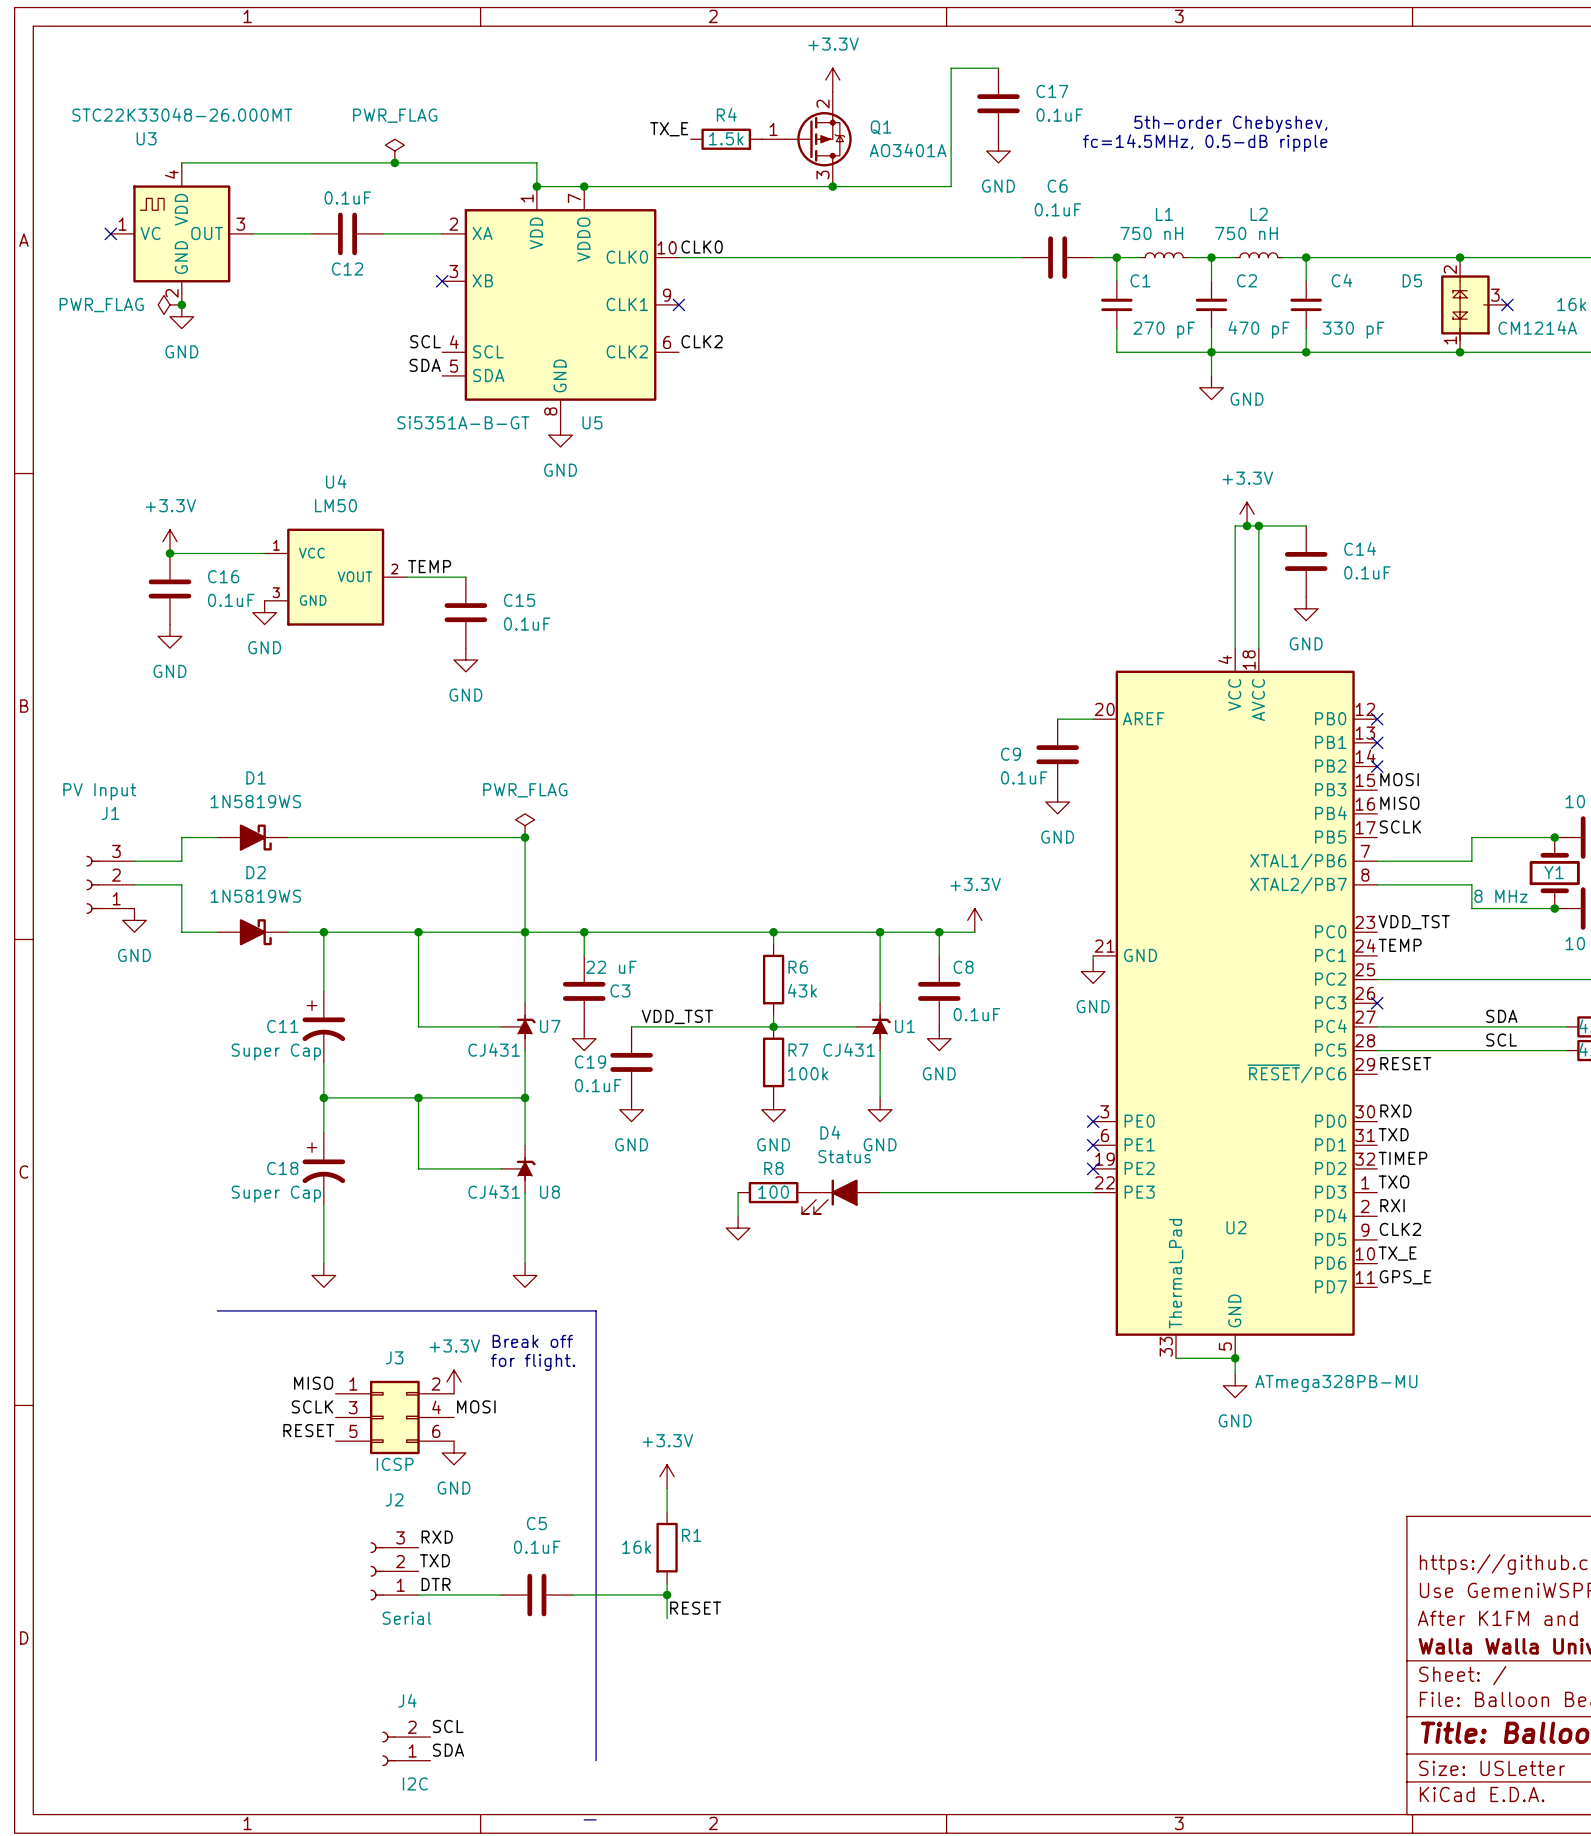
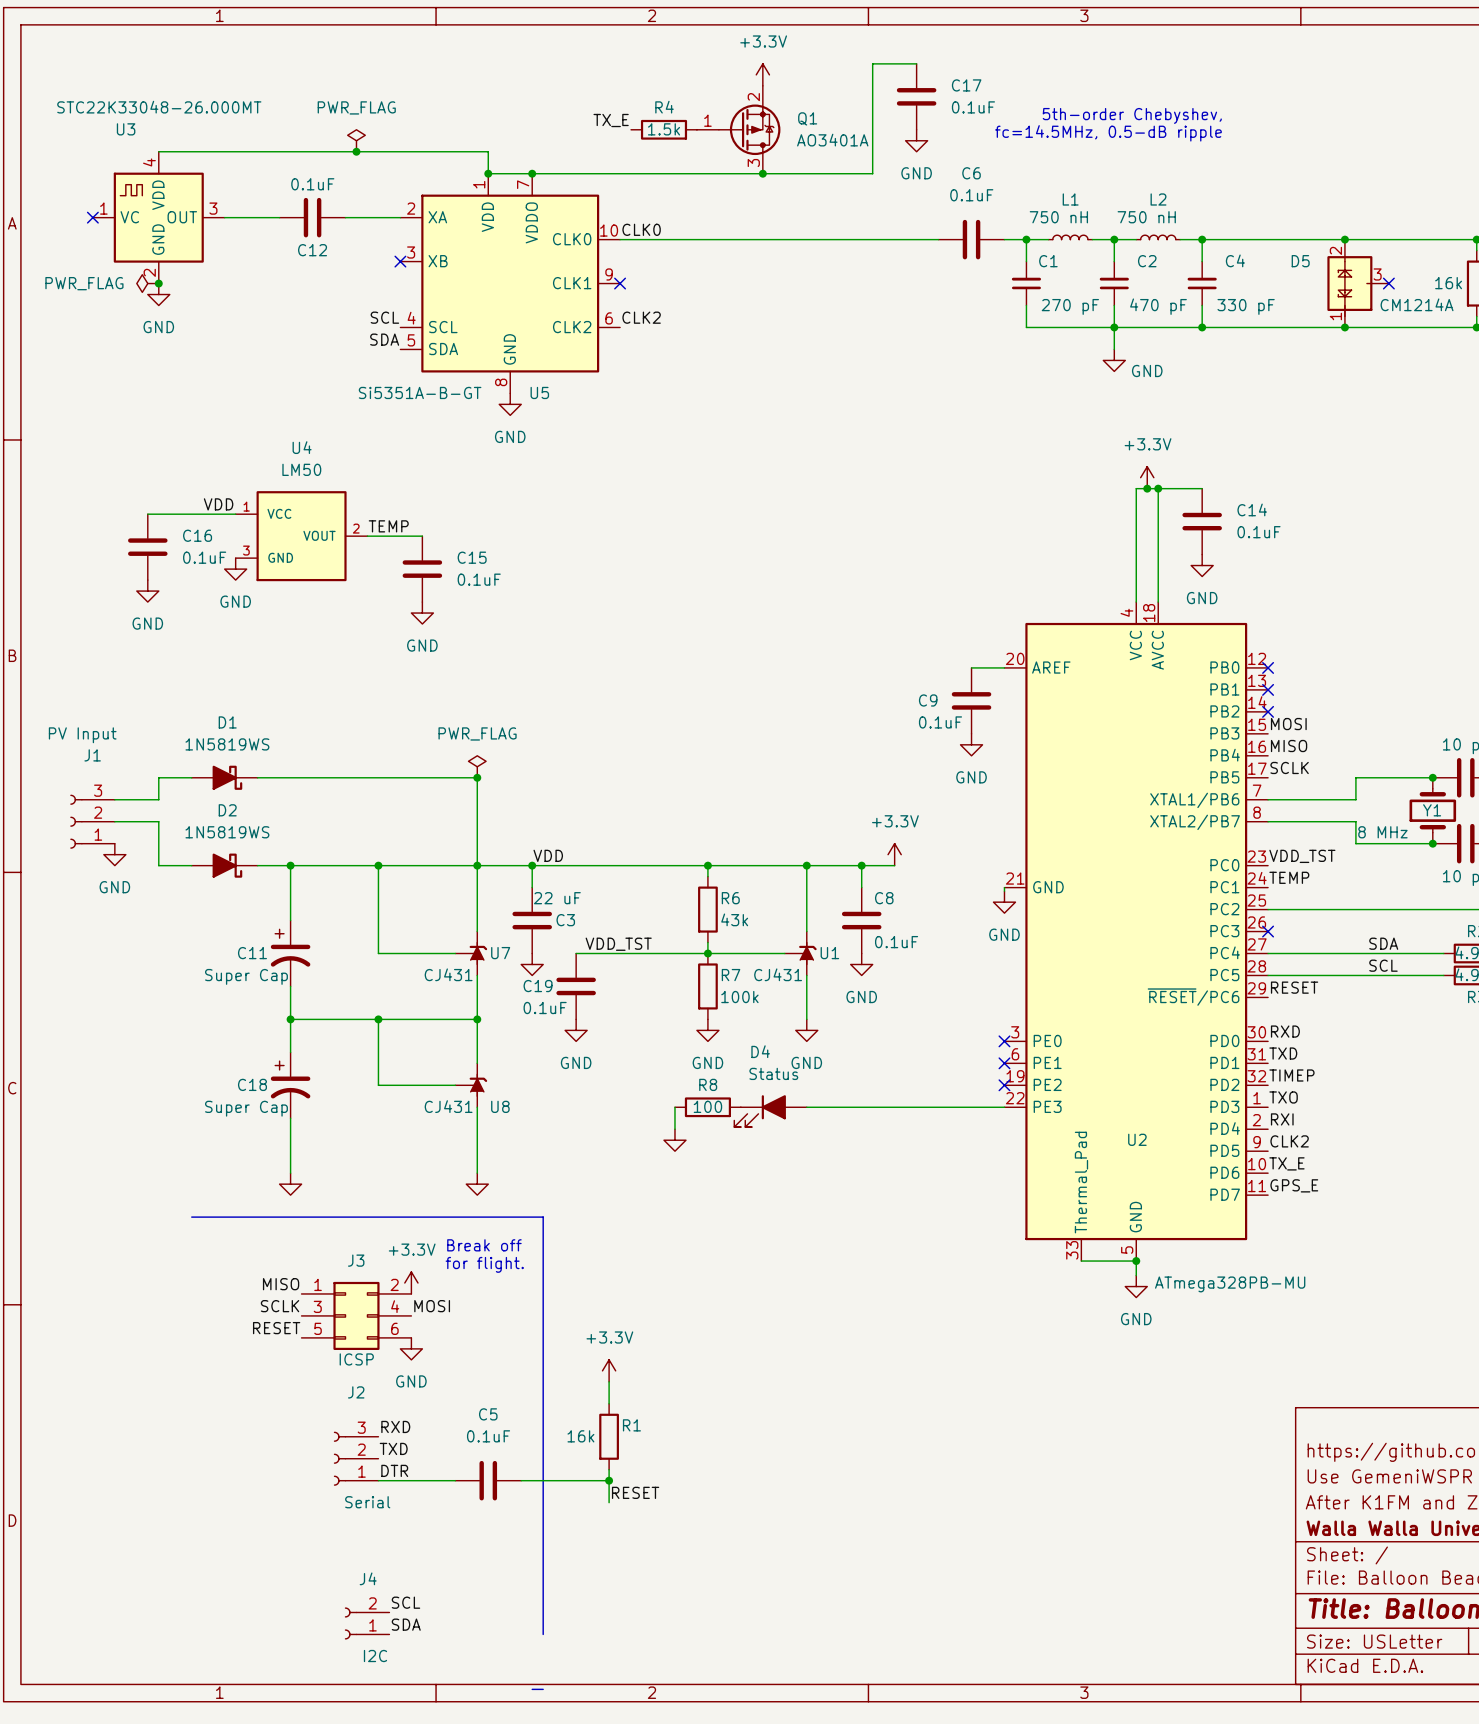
power symbol: +3.3V (169, 541) -> none
label: none -> VDD (218, 504)
junction: (169, 553) -> none
label: none -> VDD (548, 855)

